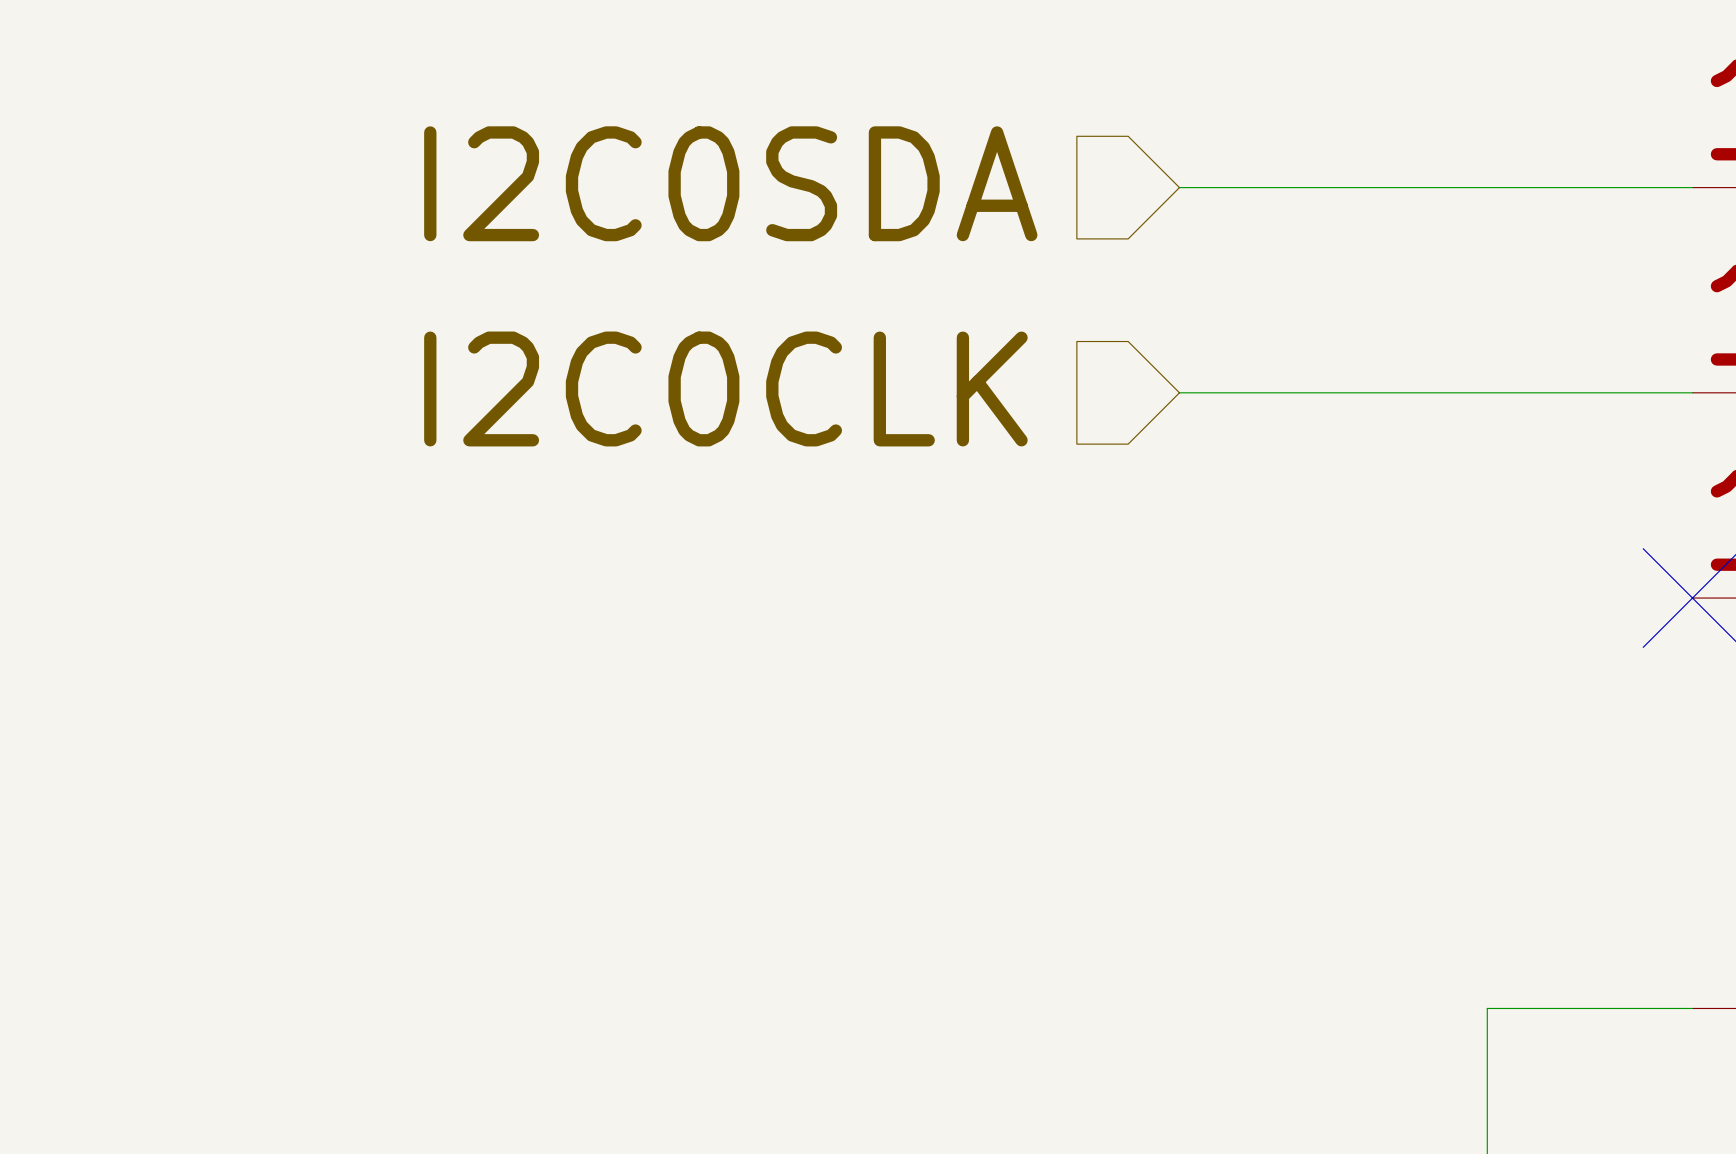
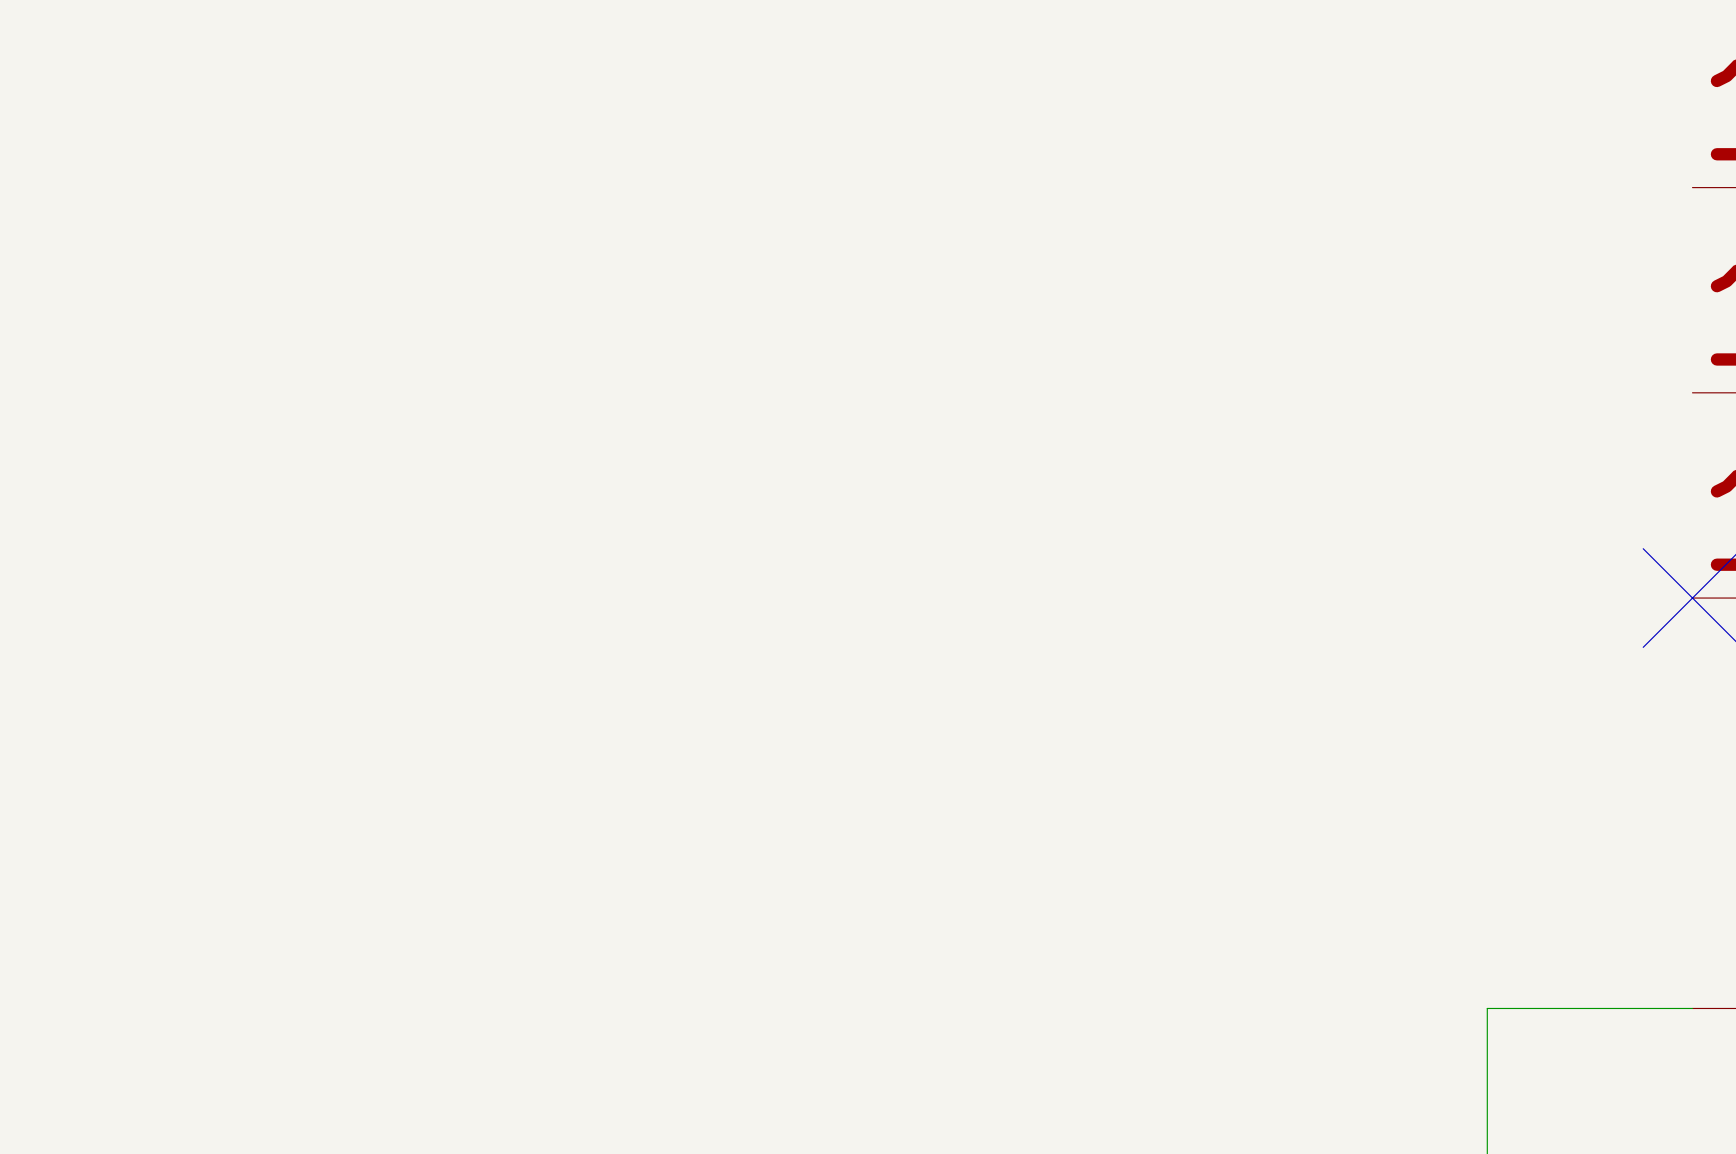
hierarchical label: I2C0SDA (730, 183) -> none
wire: (1179, 187) (1692, 187) -> none
hierarchical label: I2C0CLK (725, 388) -> none
wire: (1179, 392) (1692, 392) -> none

